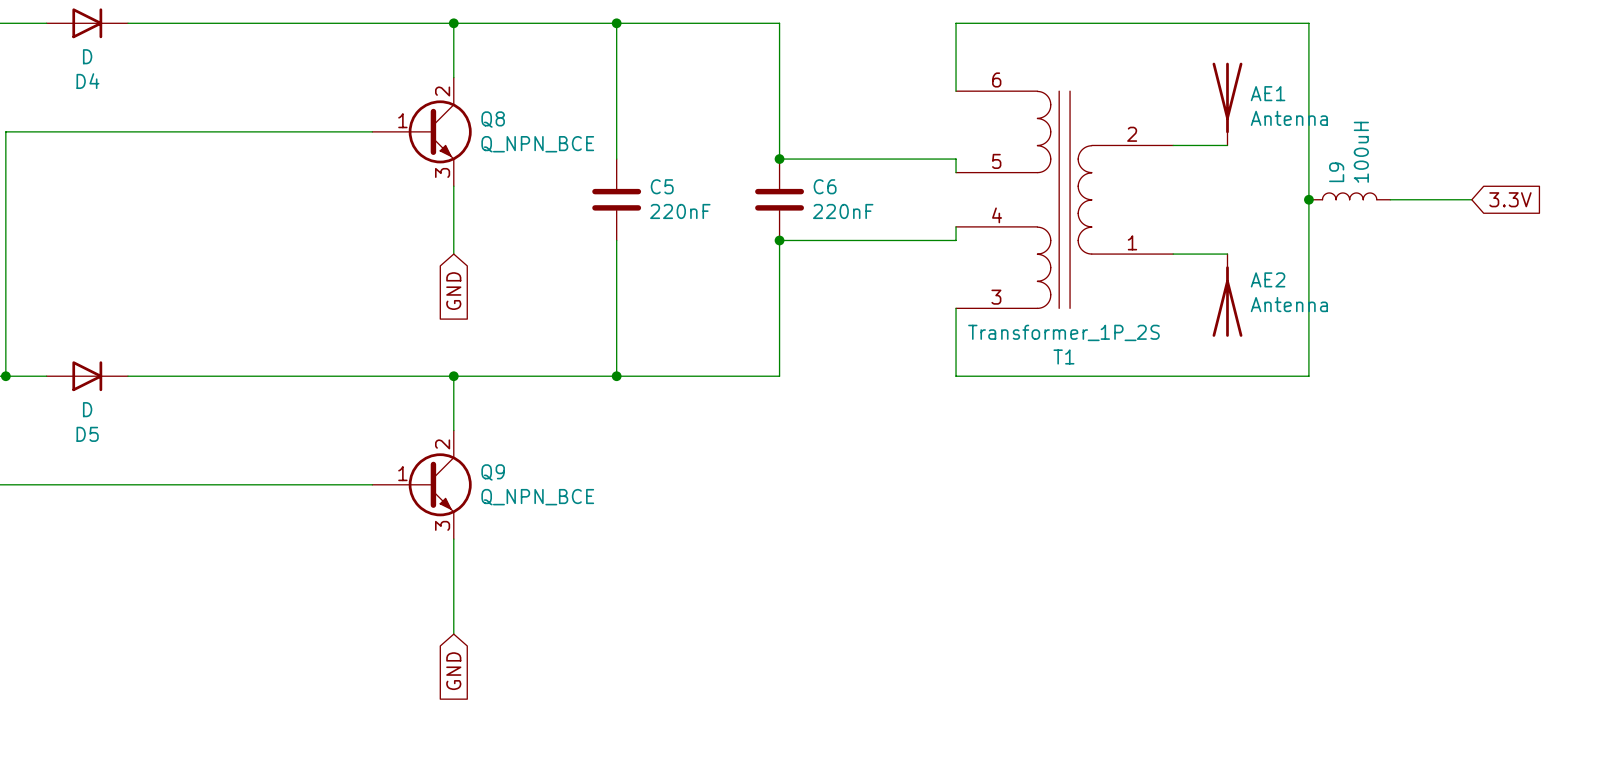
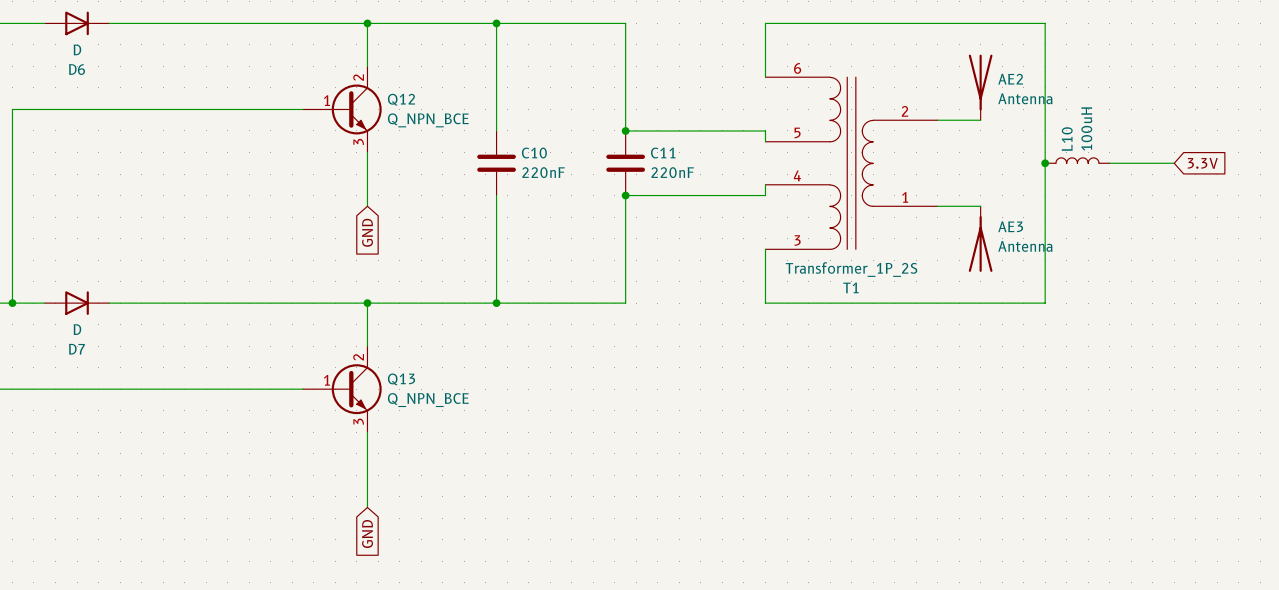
D4 name: D4 (87, 81) -> D6 (77, 69)
AE1 name: AE1 (1268, 93) -> AE2 (1010, 79)
Q8 name: Q8 (493, 119) -> Q12 (401, 99)
L9 name: L9 (1336, 172) -> L10 (1067, 139)
C5 name: C5 (662, 186) -> C10 (534, 153)
C6 name: C6 (825, 186) -> C11 (663, 153)
AE2 name: AE2 (1268, 279) -> AE3 (1010, 226)
D5 name: D5 (87, 434) -> D7 (76, 349)
Q9 name: Q9 (493, 472) -> Q13 (401, 379)

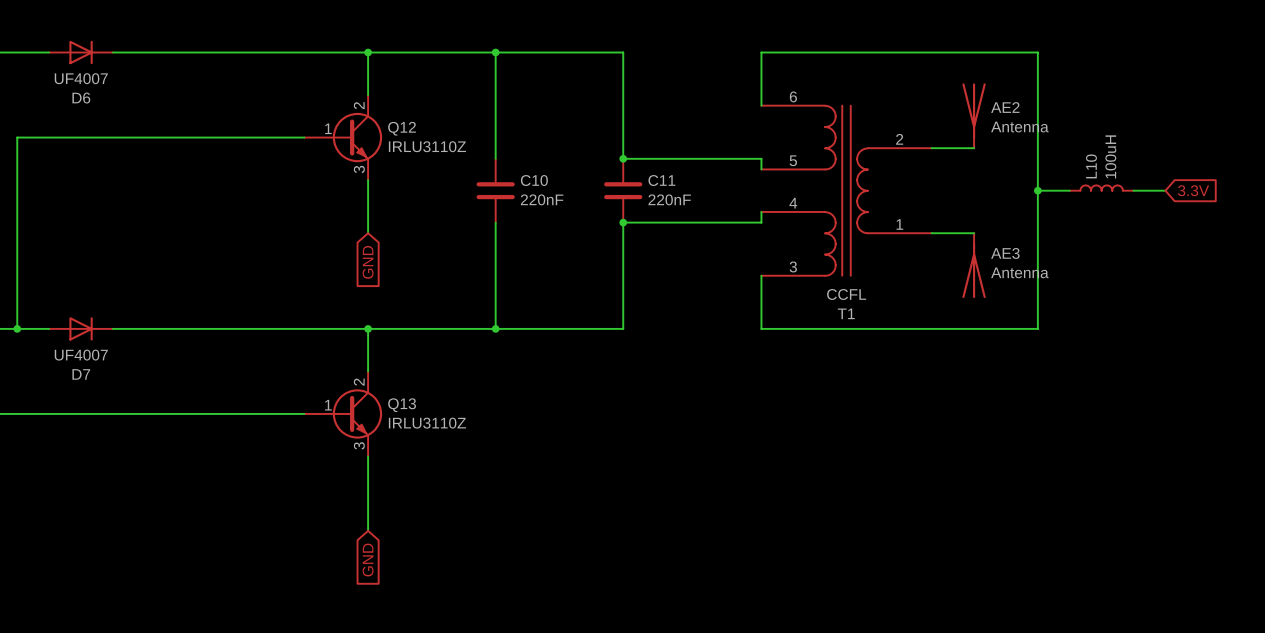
D6 value: D (77, 49) -> UF4007 (81, 78)
Q12 value: Q_NPN_BCE (428, 120) -> IRLU3110Z (427, 146)
L10 symbol: [1045, 157, 1110, 164] -> [1069, 185, 1134, 191]
wire: (1109, 163) (1141, 163) -> (1037, 190) (1069, 190)
T1 value: Transformer_1P_2S (851, 269) -> CCFL (846, 294)
D7 value: D (77, 329) -> UF4007 (81, 355)
Q13 value: Q_NPN_BCE (428, 400) -> IRLU3110Z (427, 423)

